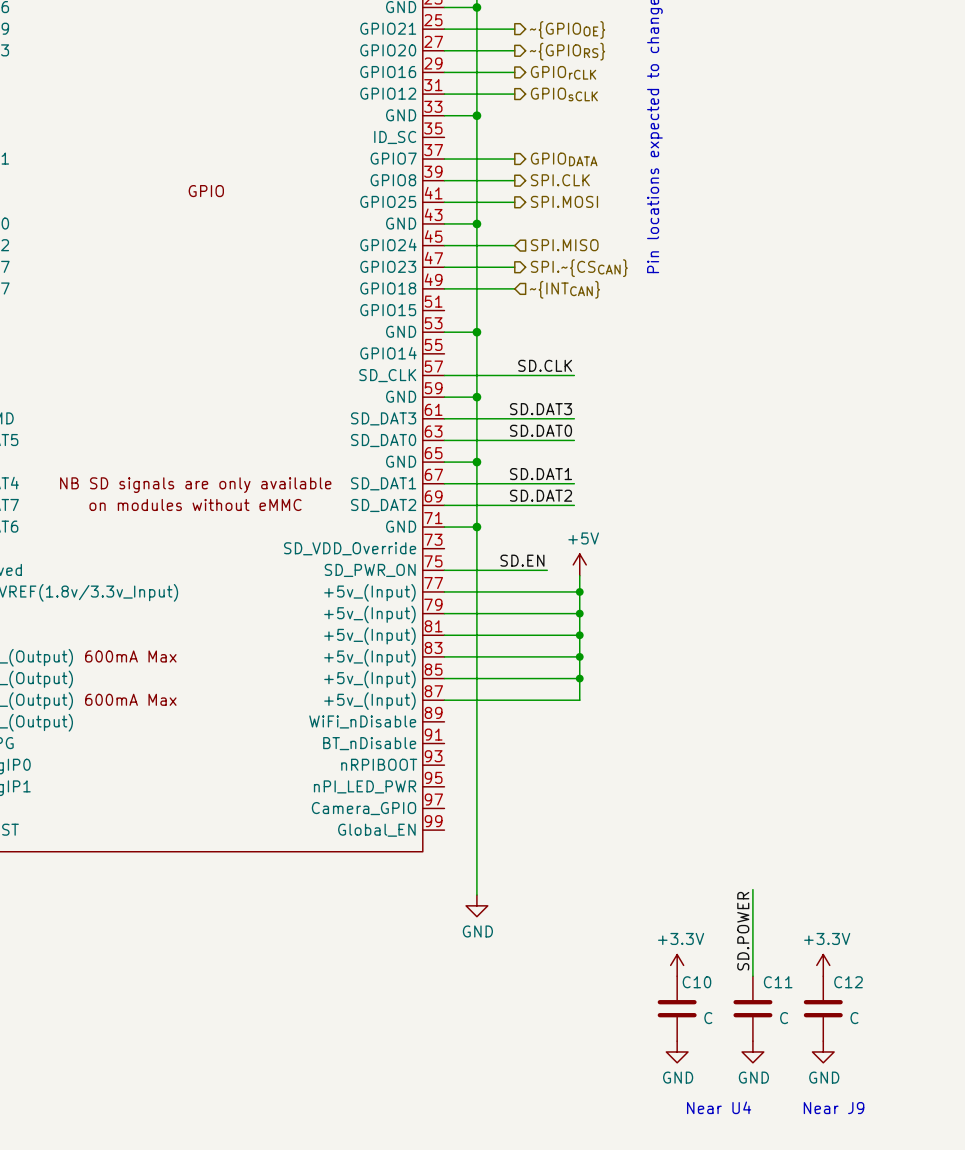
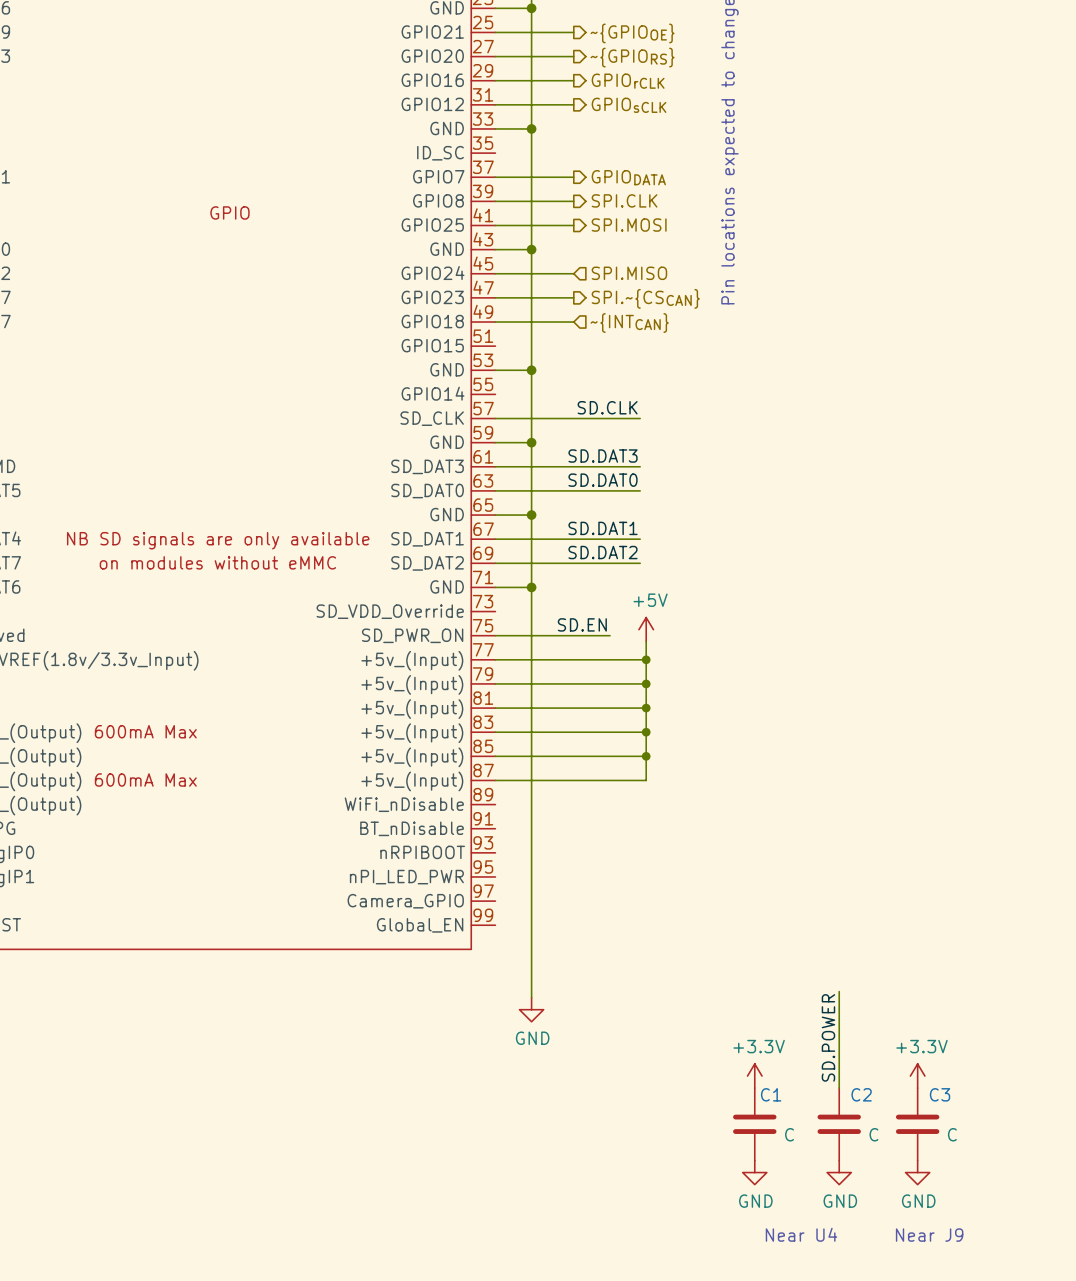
C10 name: C10 (696, 982) -> C1 (771, 1094)
C11 name: C11 (778, 982) -> C2 (861, 1094)
C12 name: C12 (848, 982) -> C3 (940, 1094)

